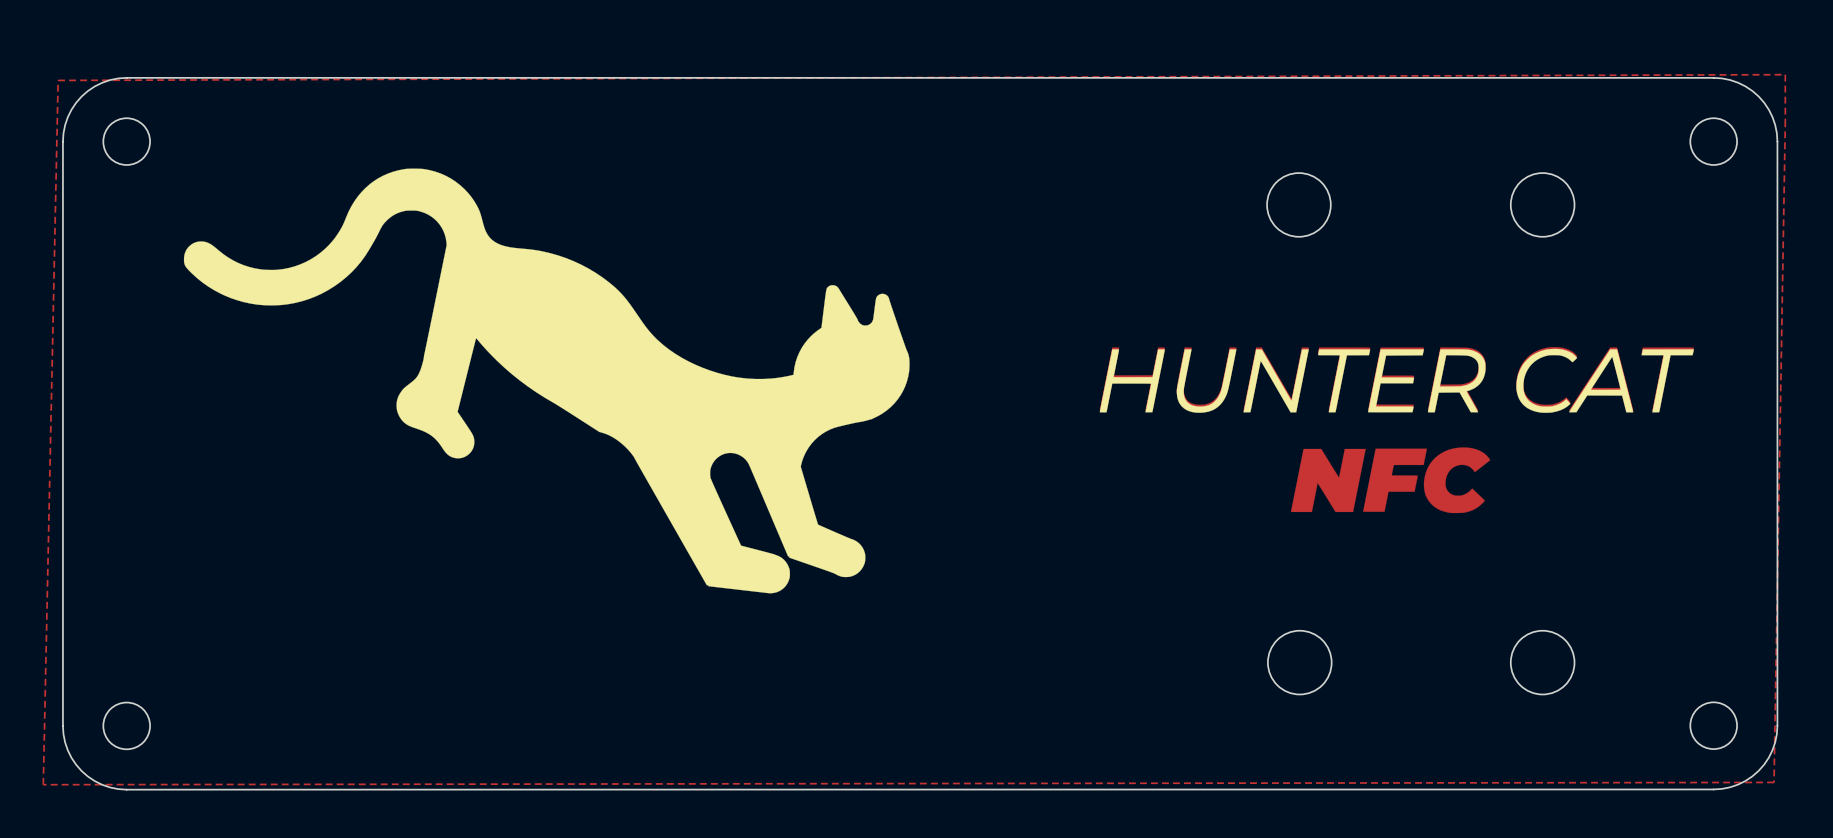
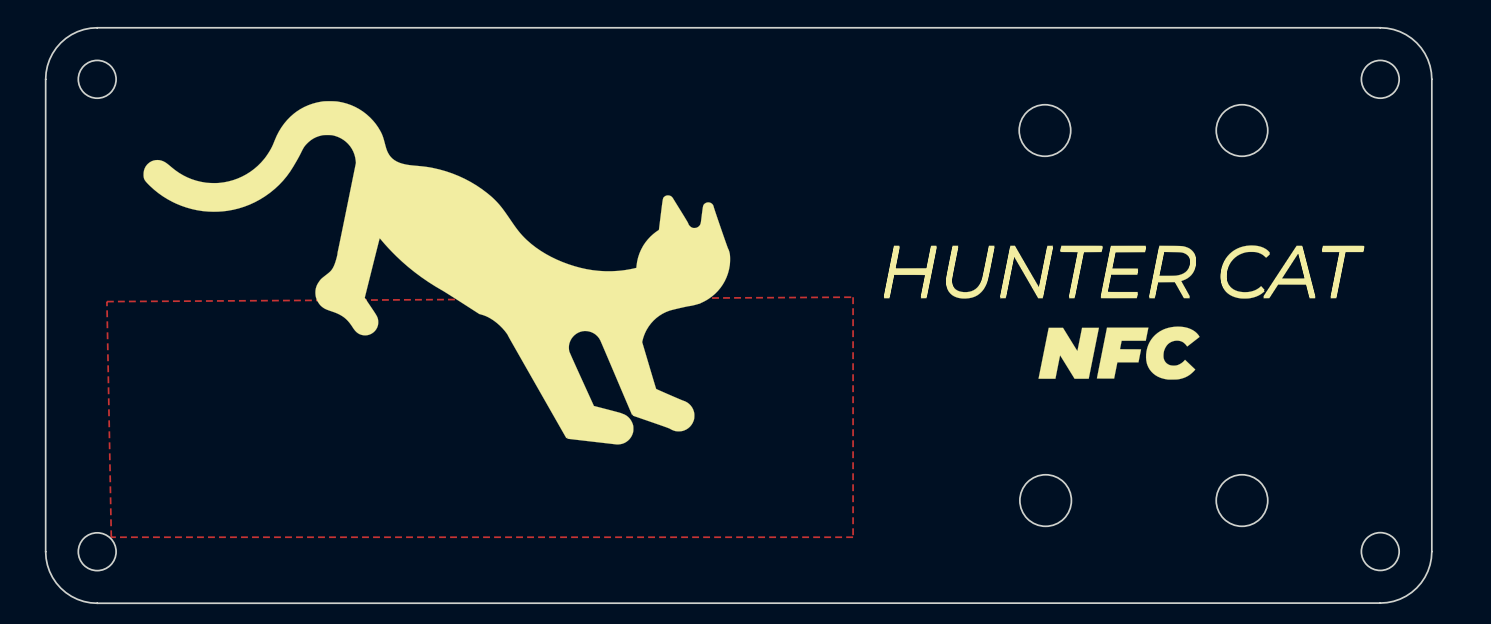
top zone outline: (1785, 74) (1774, 782) (43, 784) (58, 80) (1785, 74) -> none
drawing shape: [183, 168, 1694, 594] -> [143, 101, 1365, 445]
top zone outline: none -> (844, 297) (853, 297) (853, 537) (111, 537) (106, 301) (844, 297)

